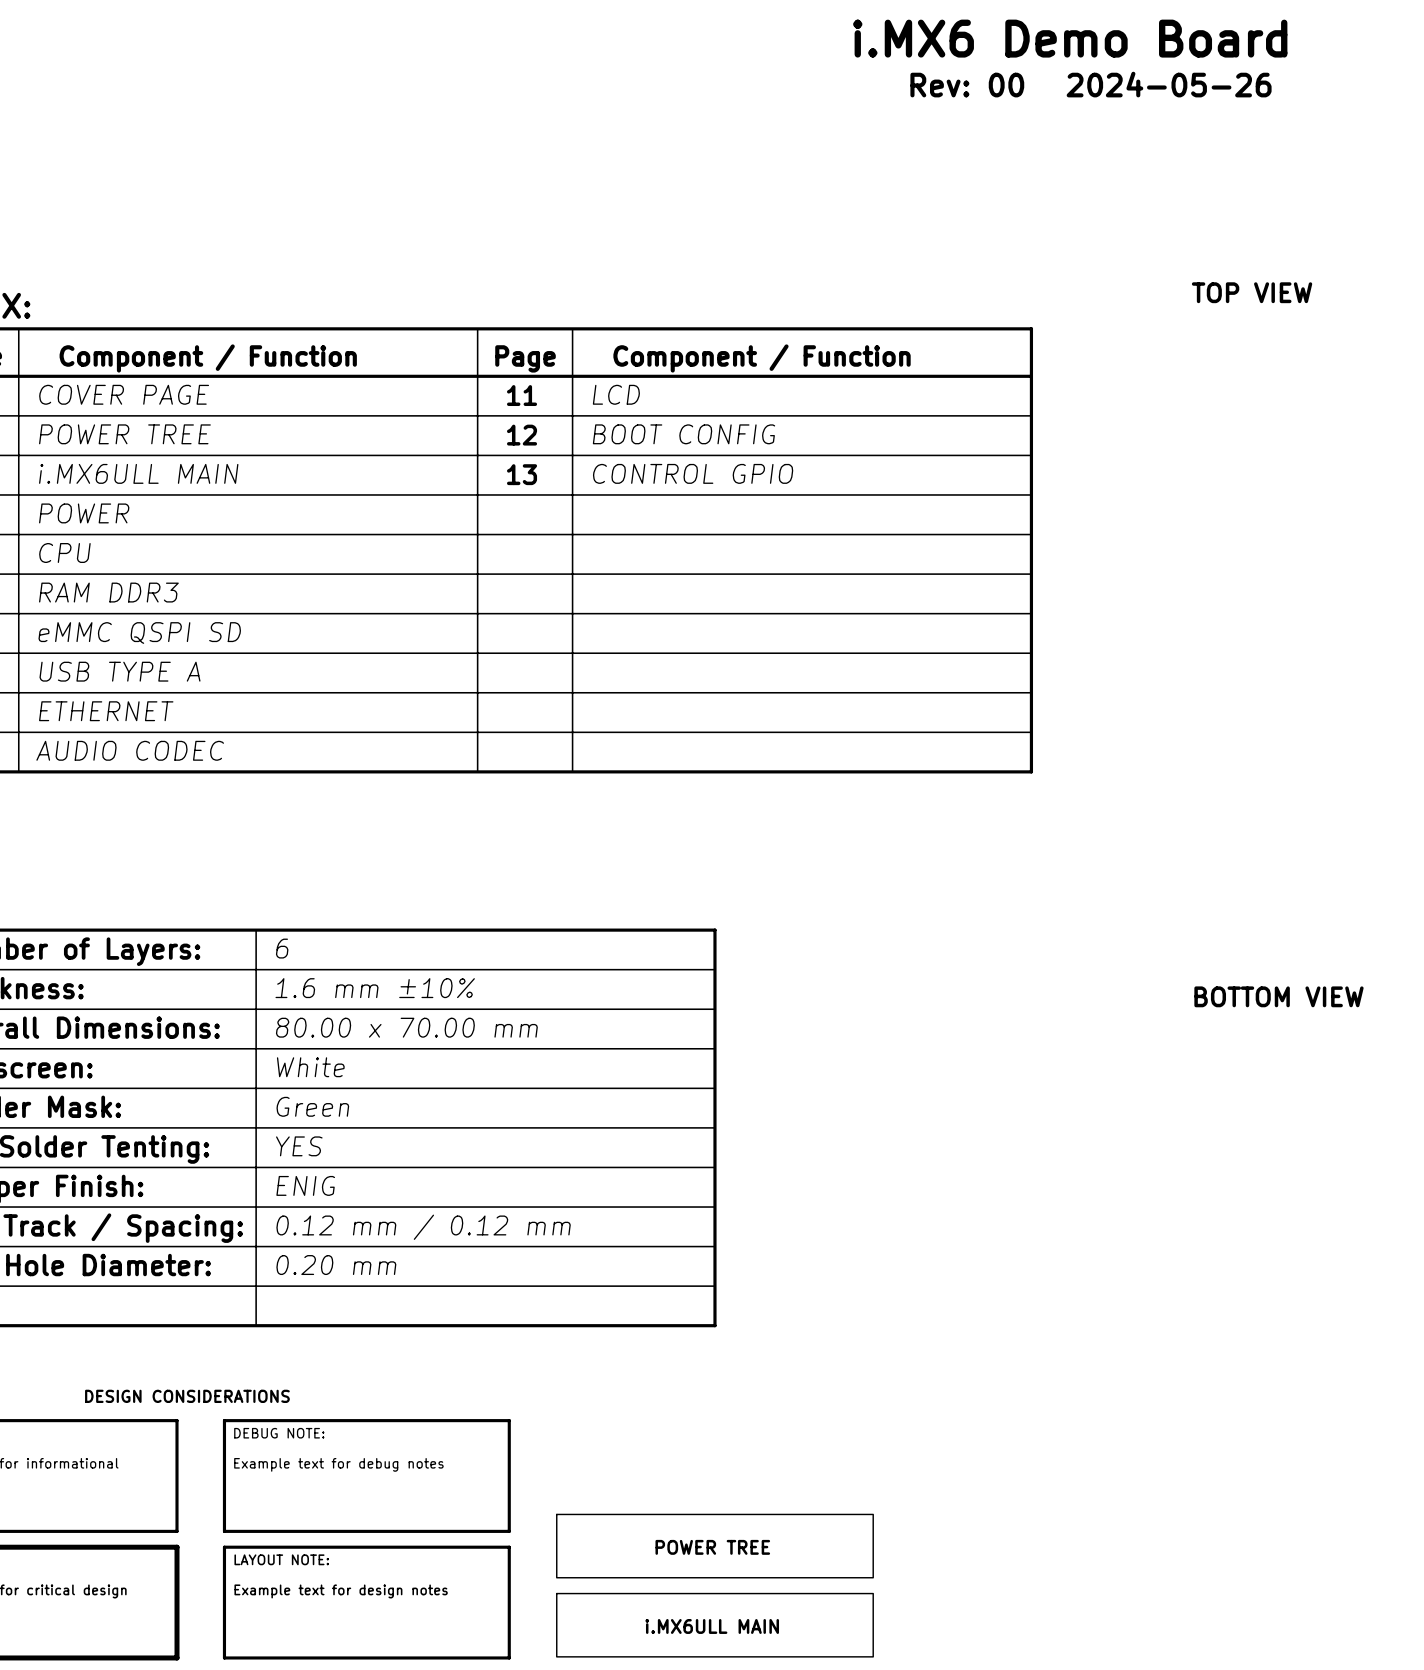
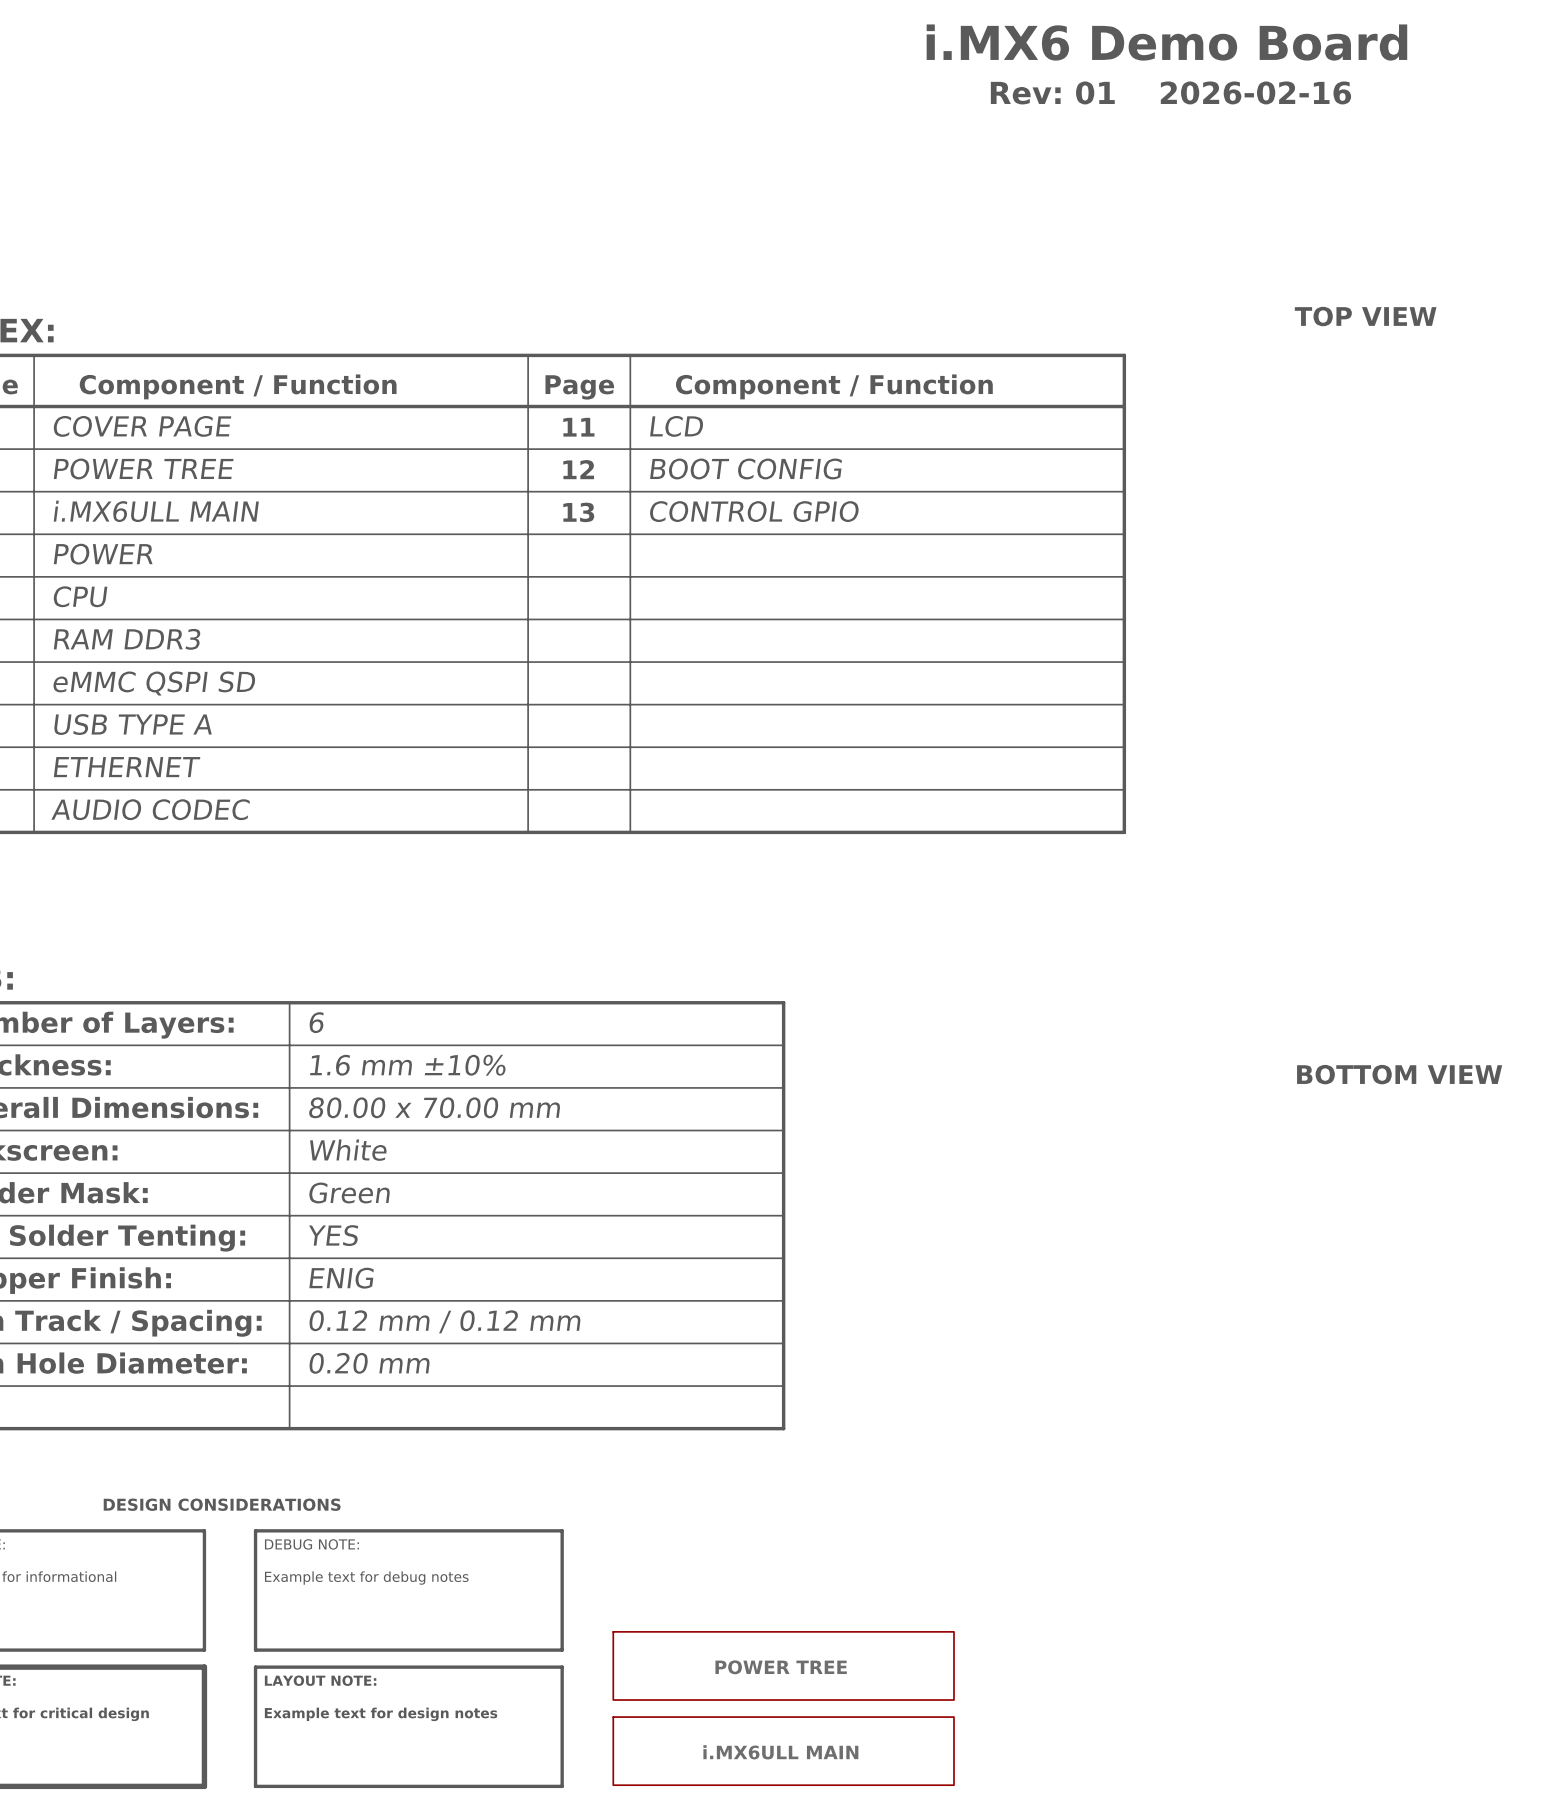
text: 2024-05-26 (1169, 84) -> 2026-02-16 (1255, 92)
text: Rev: 00 (967, 85) -> Rev: 01 (1052, 92)

